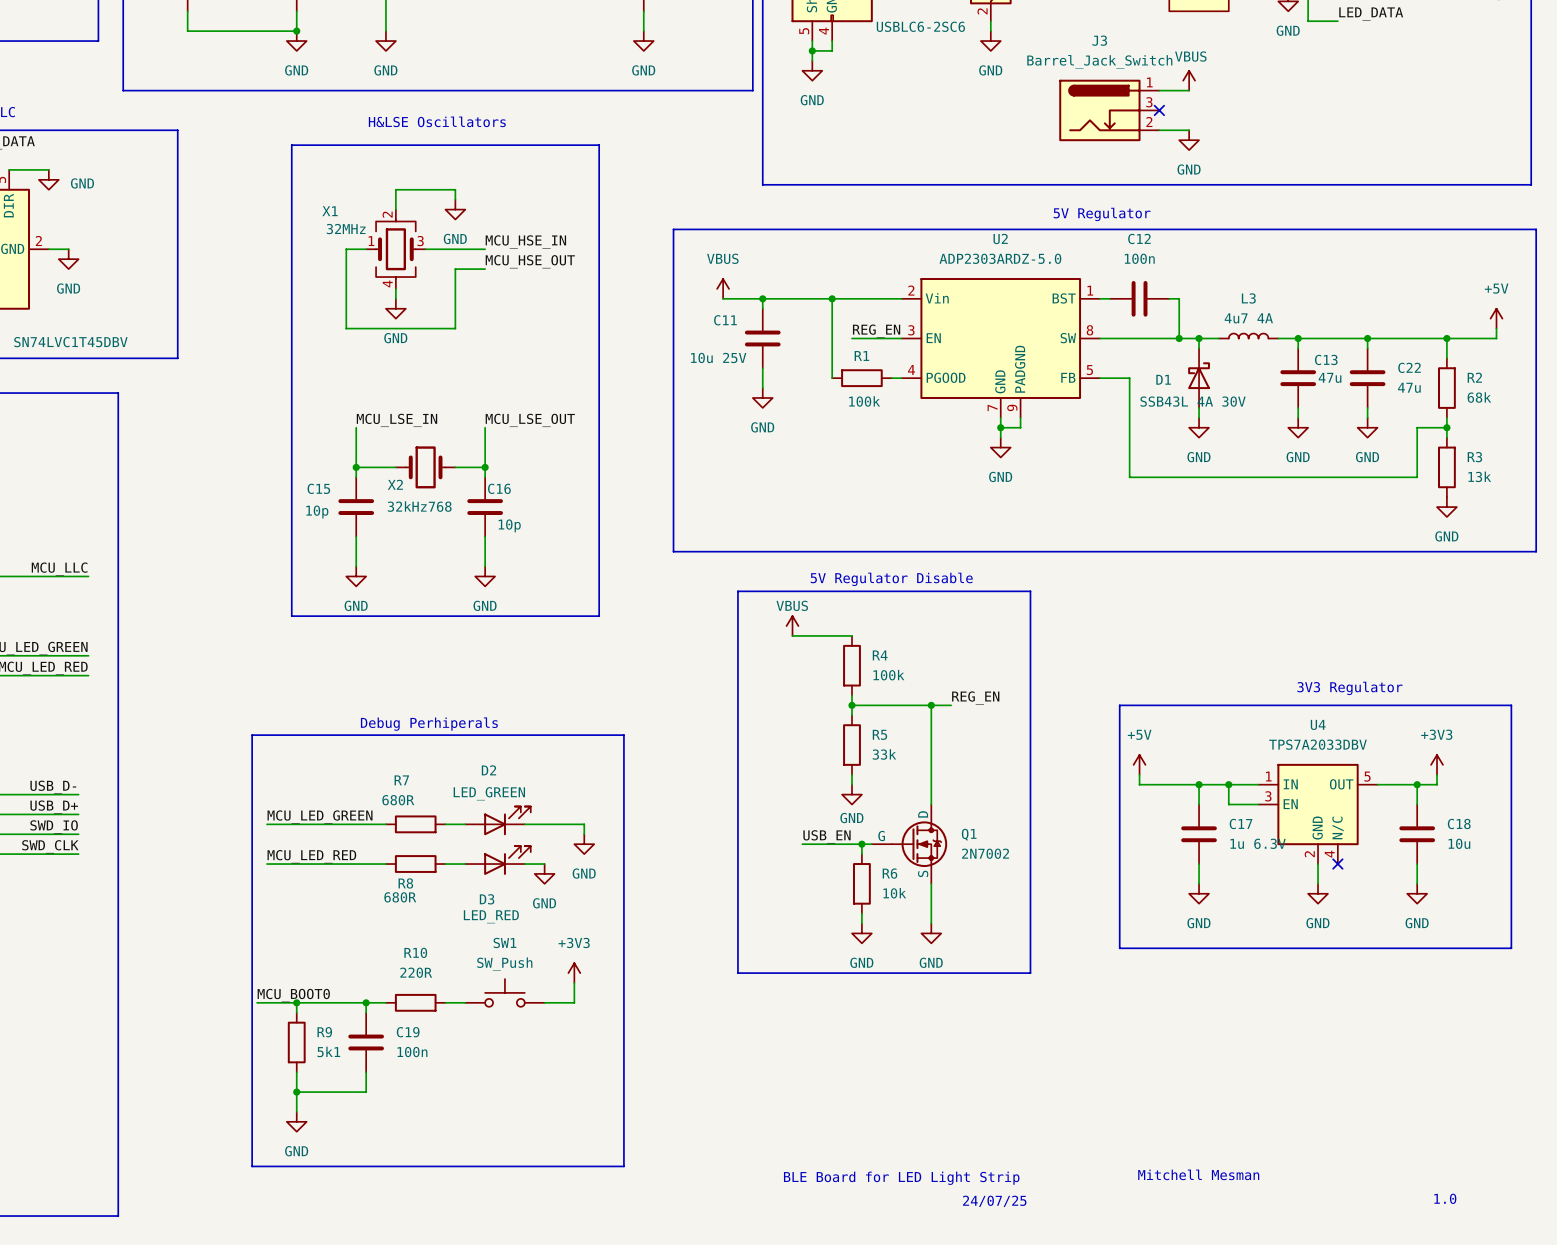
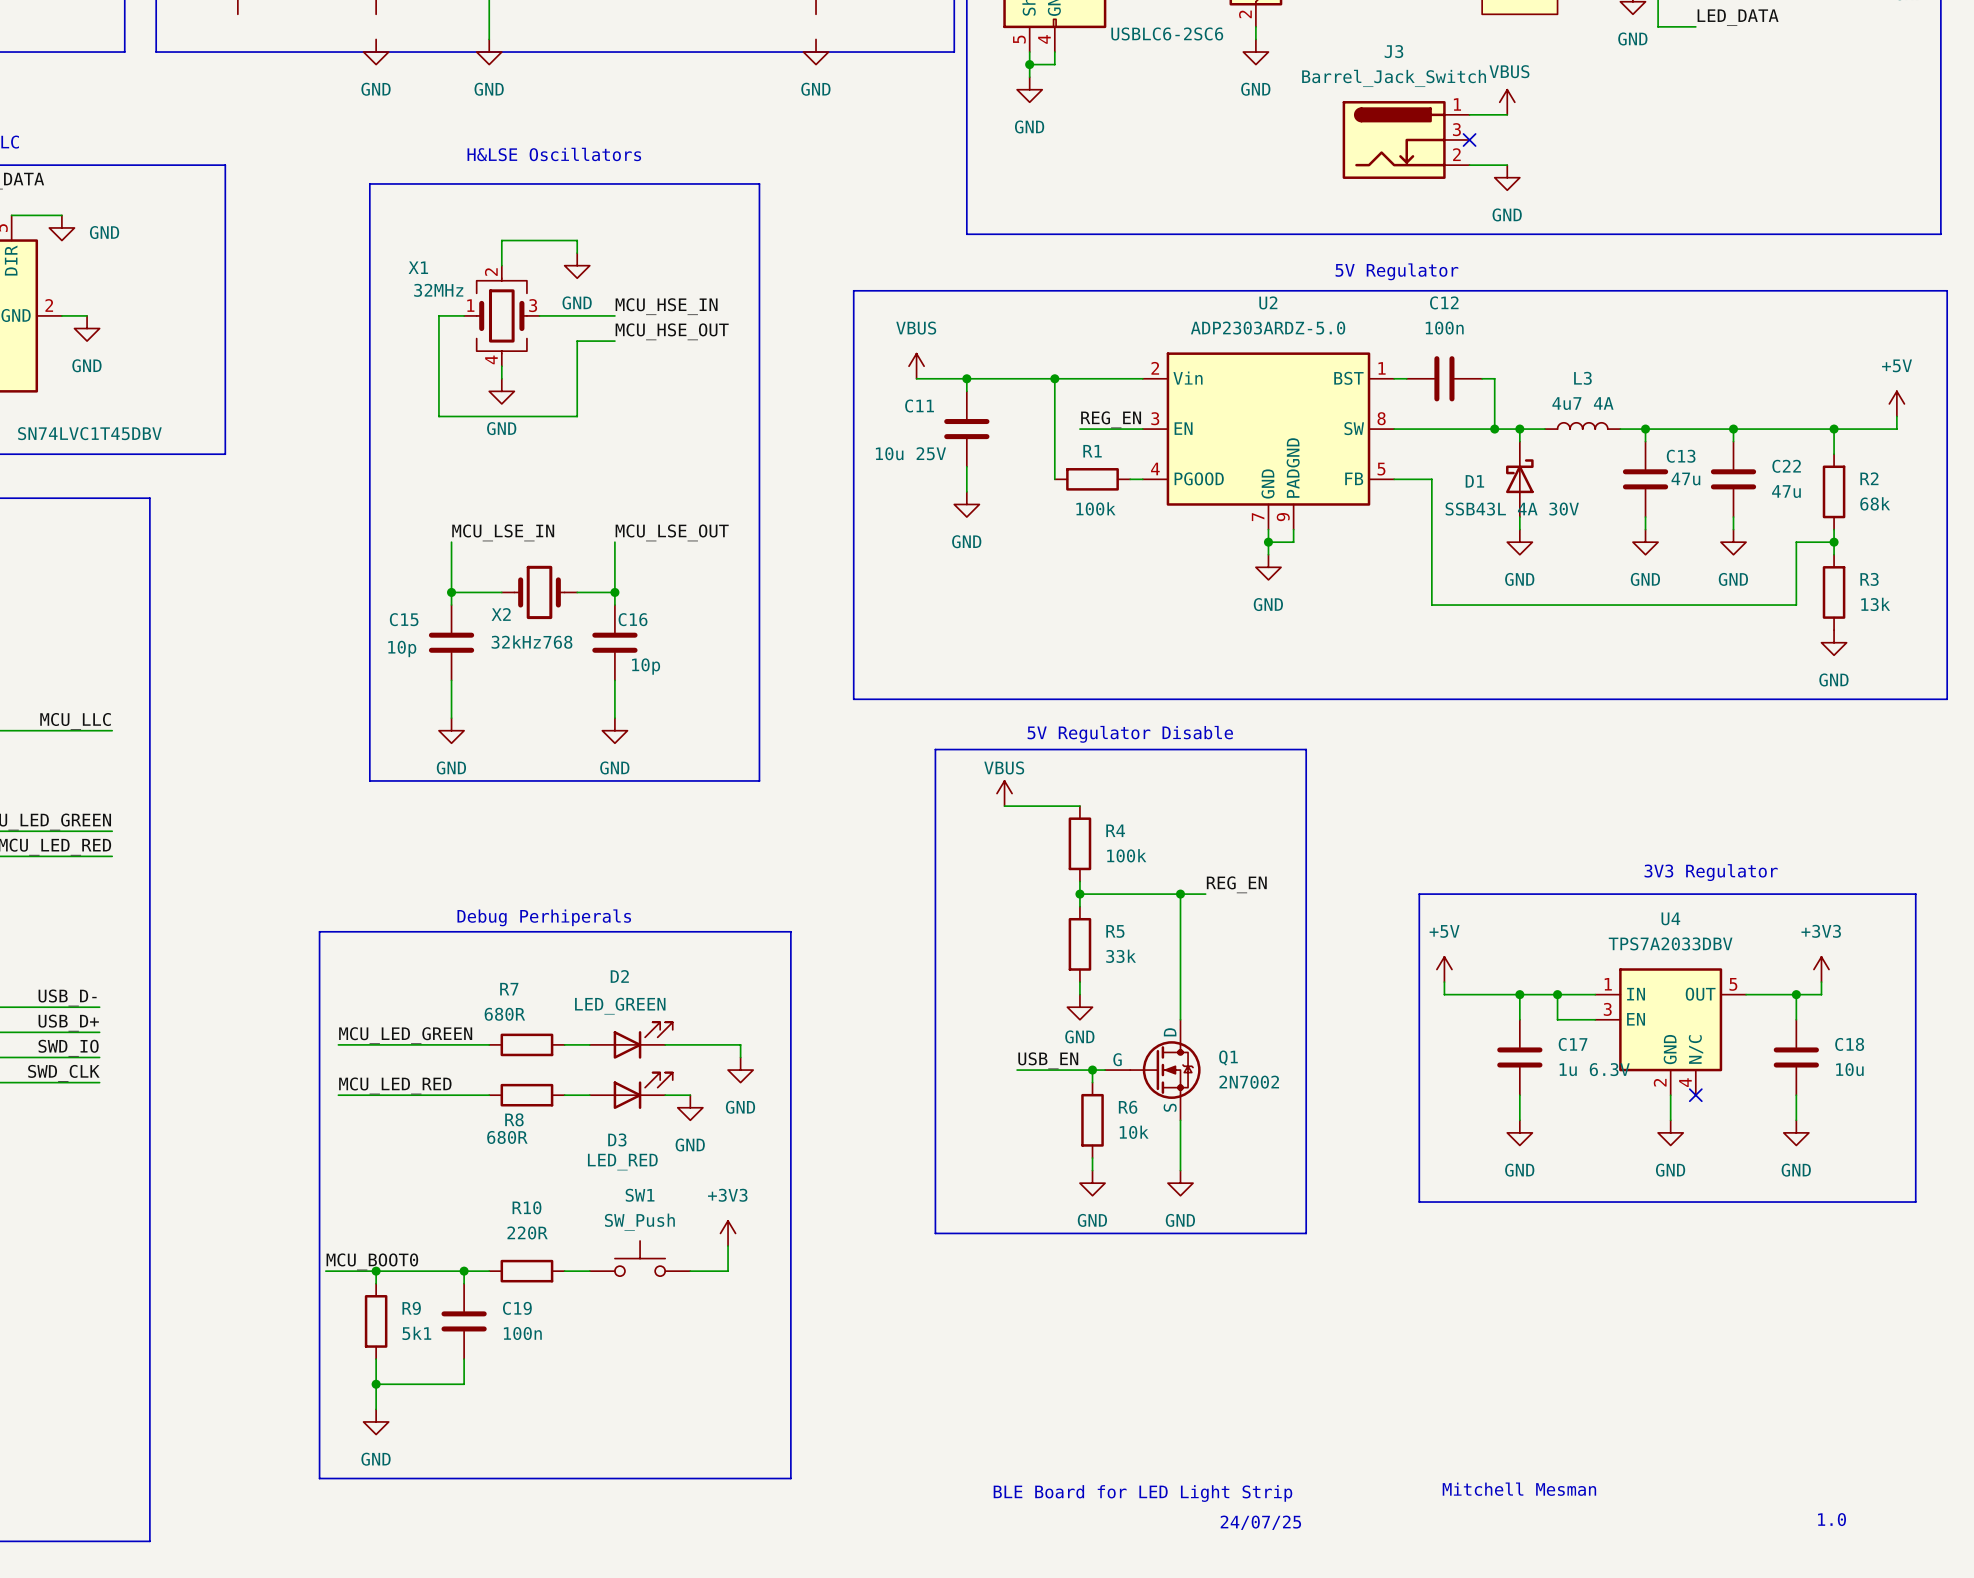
wire: (187, 11) (187, 31) (296, 31) (296, 11) -> none
wire: (643, 11) (643, 31) -> none
junction: (296, 31) -> none
line: (123, 41) (123, 90) (752, 90) (752, 41) -> (156, 52) (954, 52)

